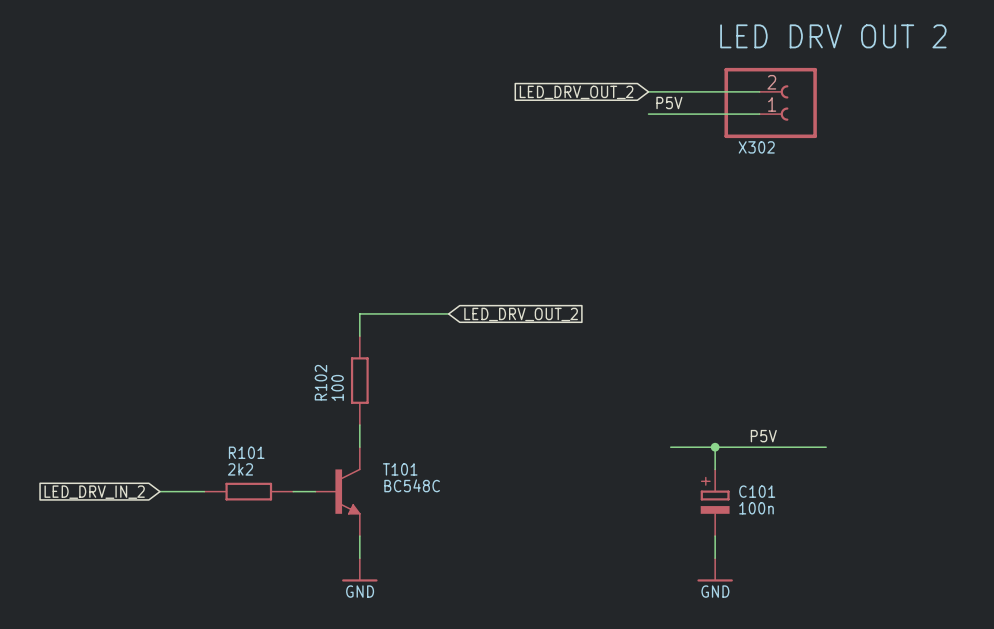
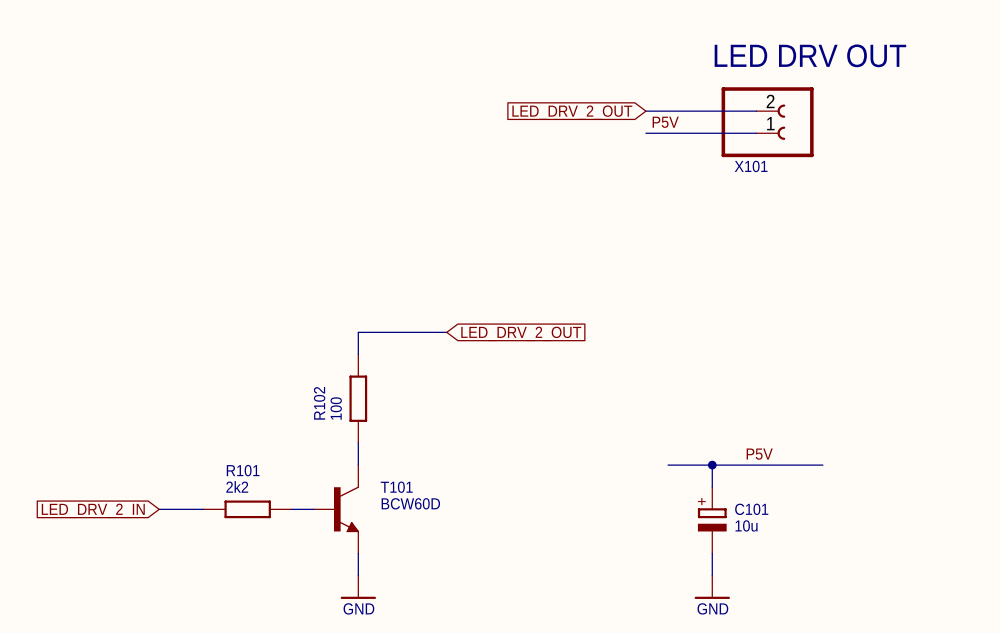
X302 text: LED DRV OUT 2 (833, 36) -> LED DRV OUT (810, 55)
global label: LED_DRV_OUT_2 (576, 92) -> LED_DRV_2_OUT (572, 112)
X302 name: X302 (756, 147) -> X101 (751, 166)
global label: LED_DRV_OUT_2 (521, 314) -> LED_DRV_2_OUT (521, 333)
T101 value: BC548C (412, 485) -> BCW60D (410, 503)
global label: LED_DRV_IN_2 (94, 492) -> LED_DRV_2_IN (93, 510)
C101 value: 100n (756, 508) -> 10u (746, 525)

